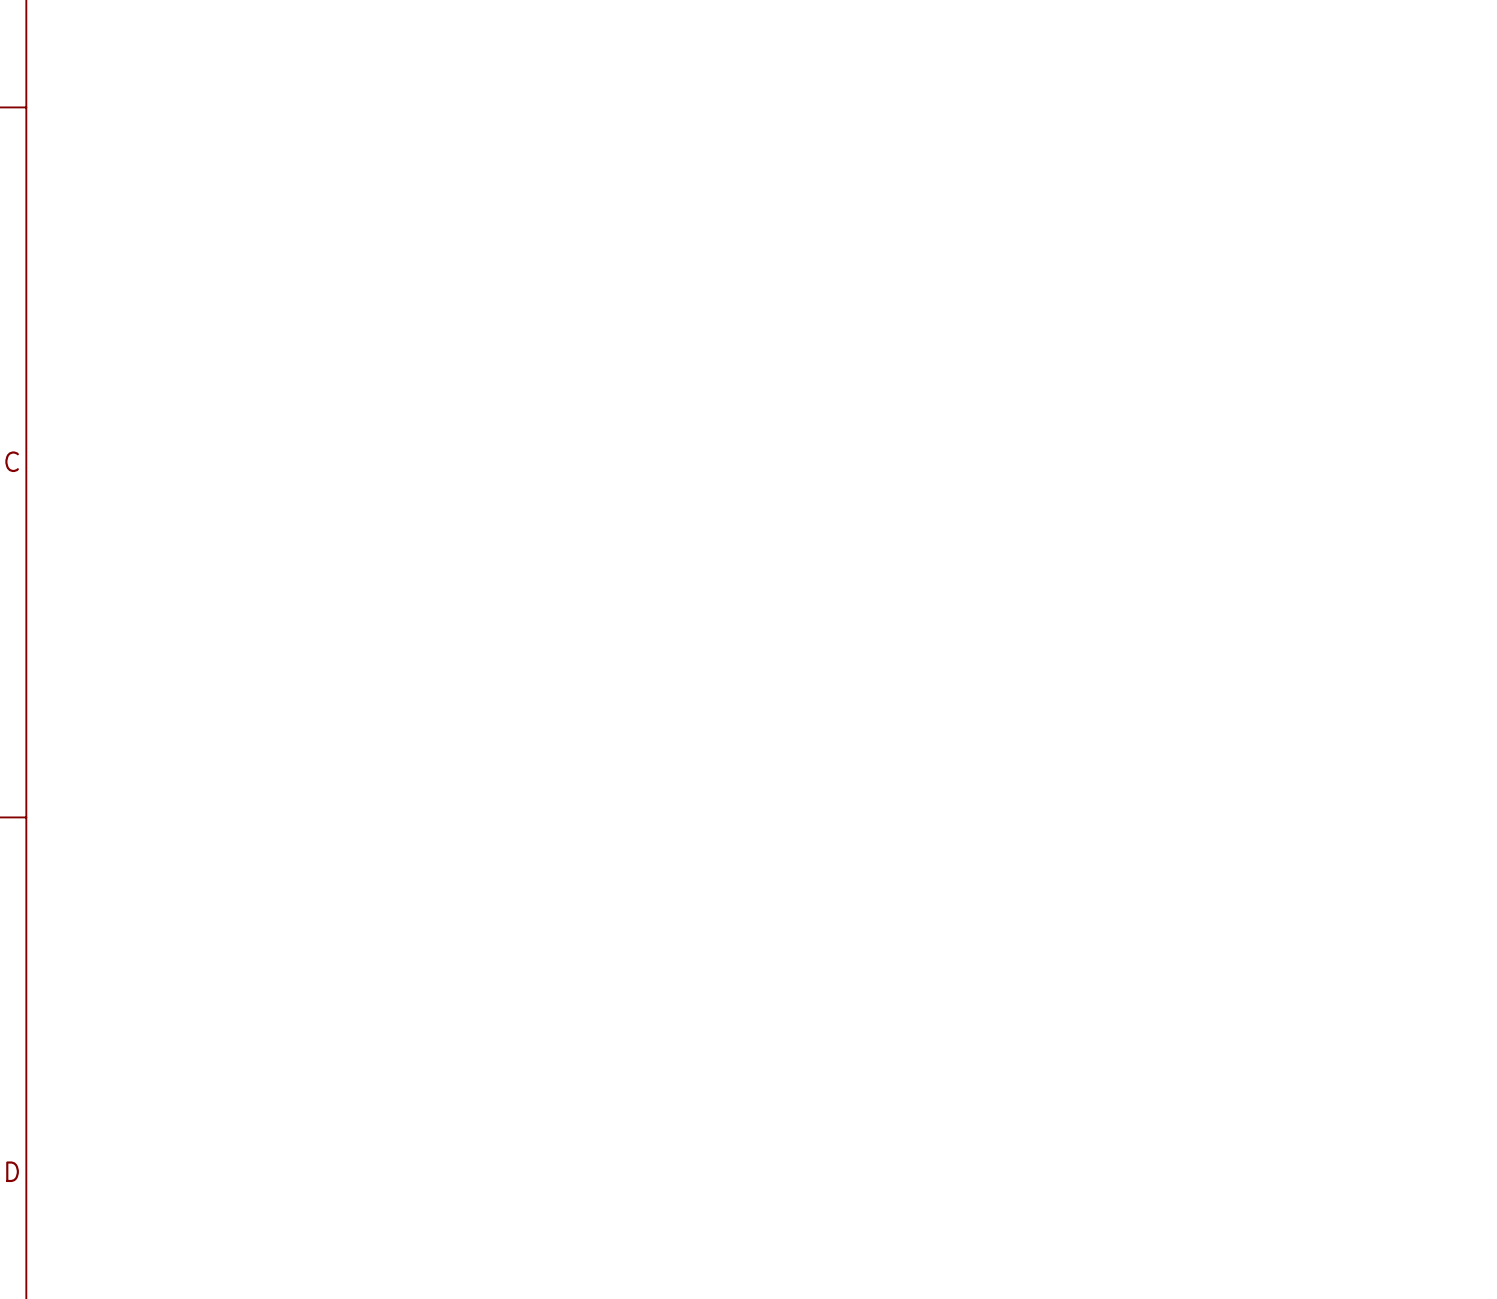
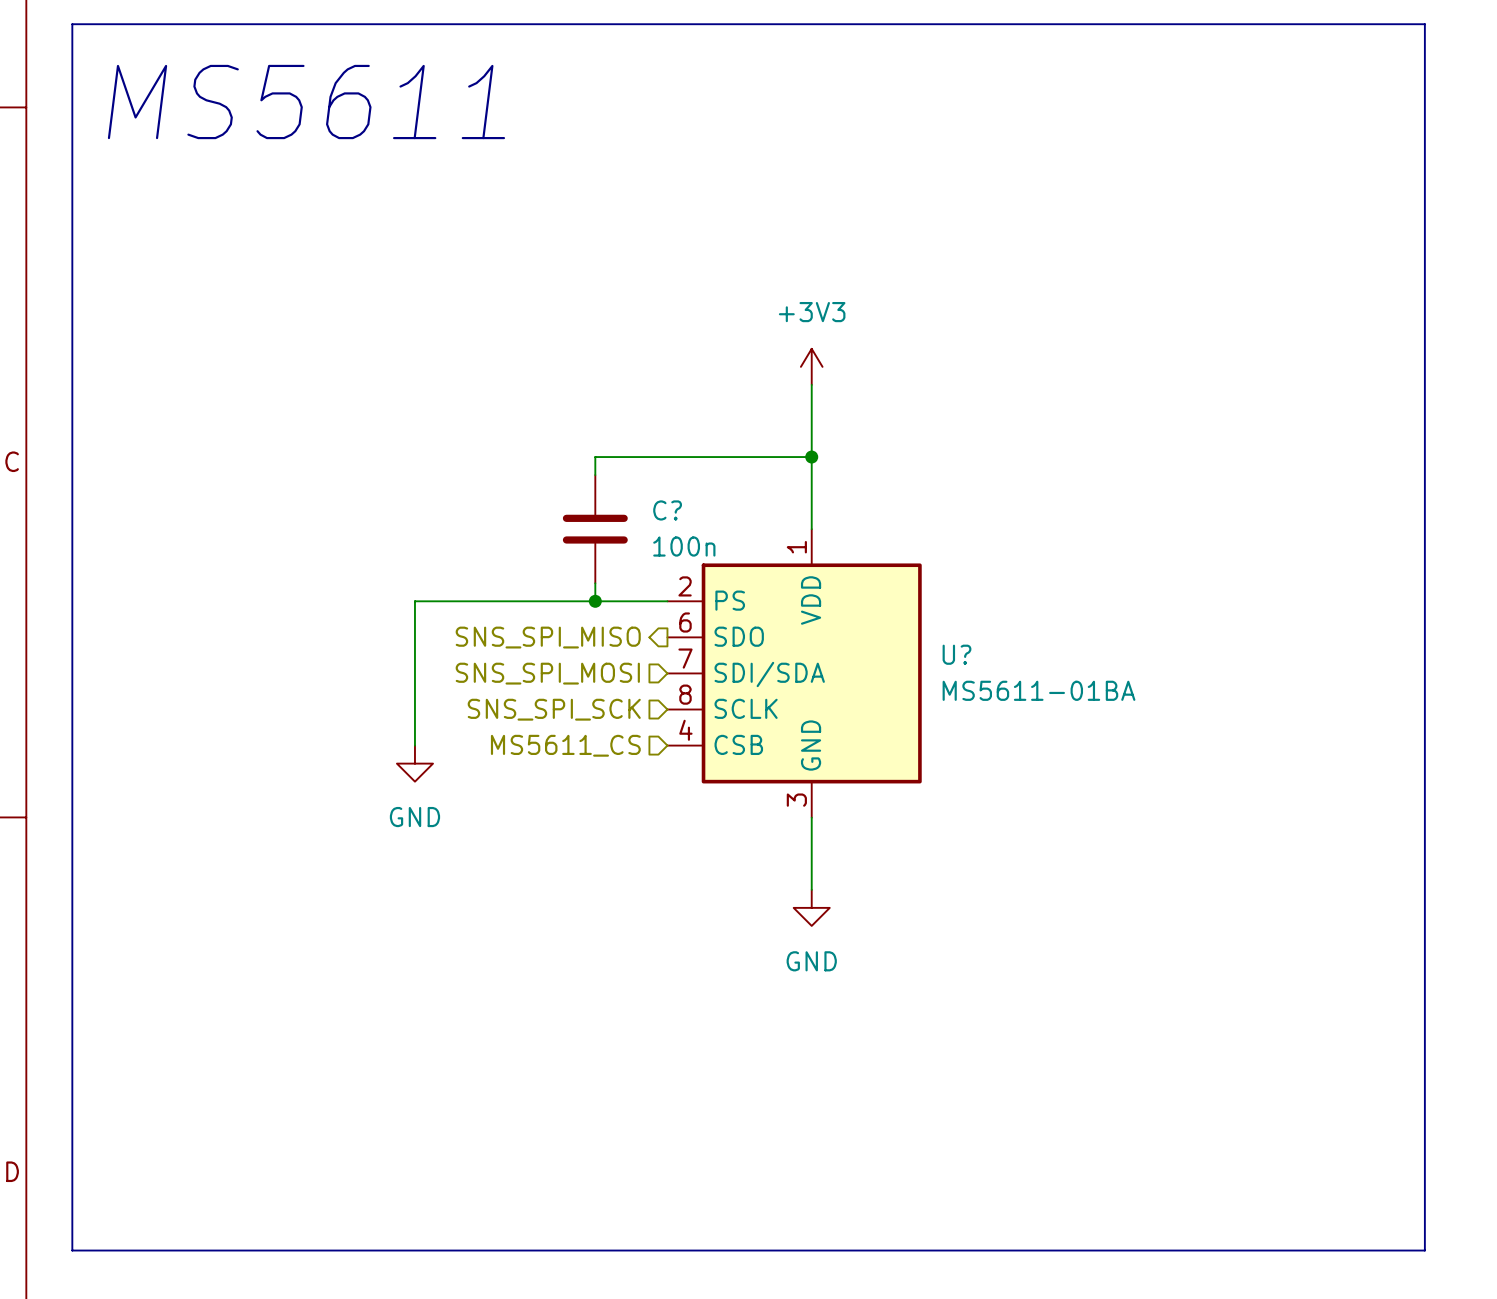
line: none -> (72, 24) (72, 1250) (1424, 1250) (1424, 24) (72, 24)
text: none -> MS5611 (306, 102)
power symbol: none -> +3V3 (811, 366)
wire: none -> (811, 384) (811, 529)
wire: none -> (811, 457) (595, 457) (595, 475)
junction: none -> (811, 457)
C?: none -> 100n (595, 529)
wire: none -> (595, 583) (595, 601)
junction: none -> (595, 601)
wire: none -> (667, 601) (414, 601) (414, 745)
hierarchical label: none -> SNS_SPI_MISO (548, 637)
hierarchical label: none -> SNS_SPI_MOSI (547, 673)
U?: none -> MS5611-01BA (794, 673)
hierarchical label: none -> SNS_SPI_SCK (554, 709)
hierarchical label: none -> MS5611_CS (565, 745)
power symbol: none -> GND (414, 763)
wire: none -> (811, 817) (811, 889)
power symbol: none -> GND (811, 907)

